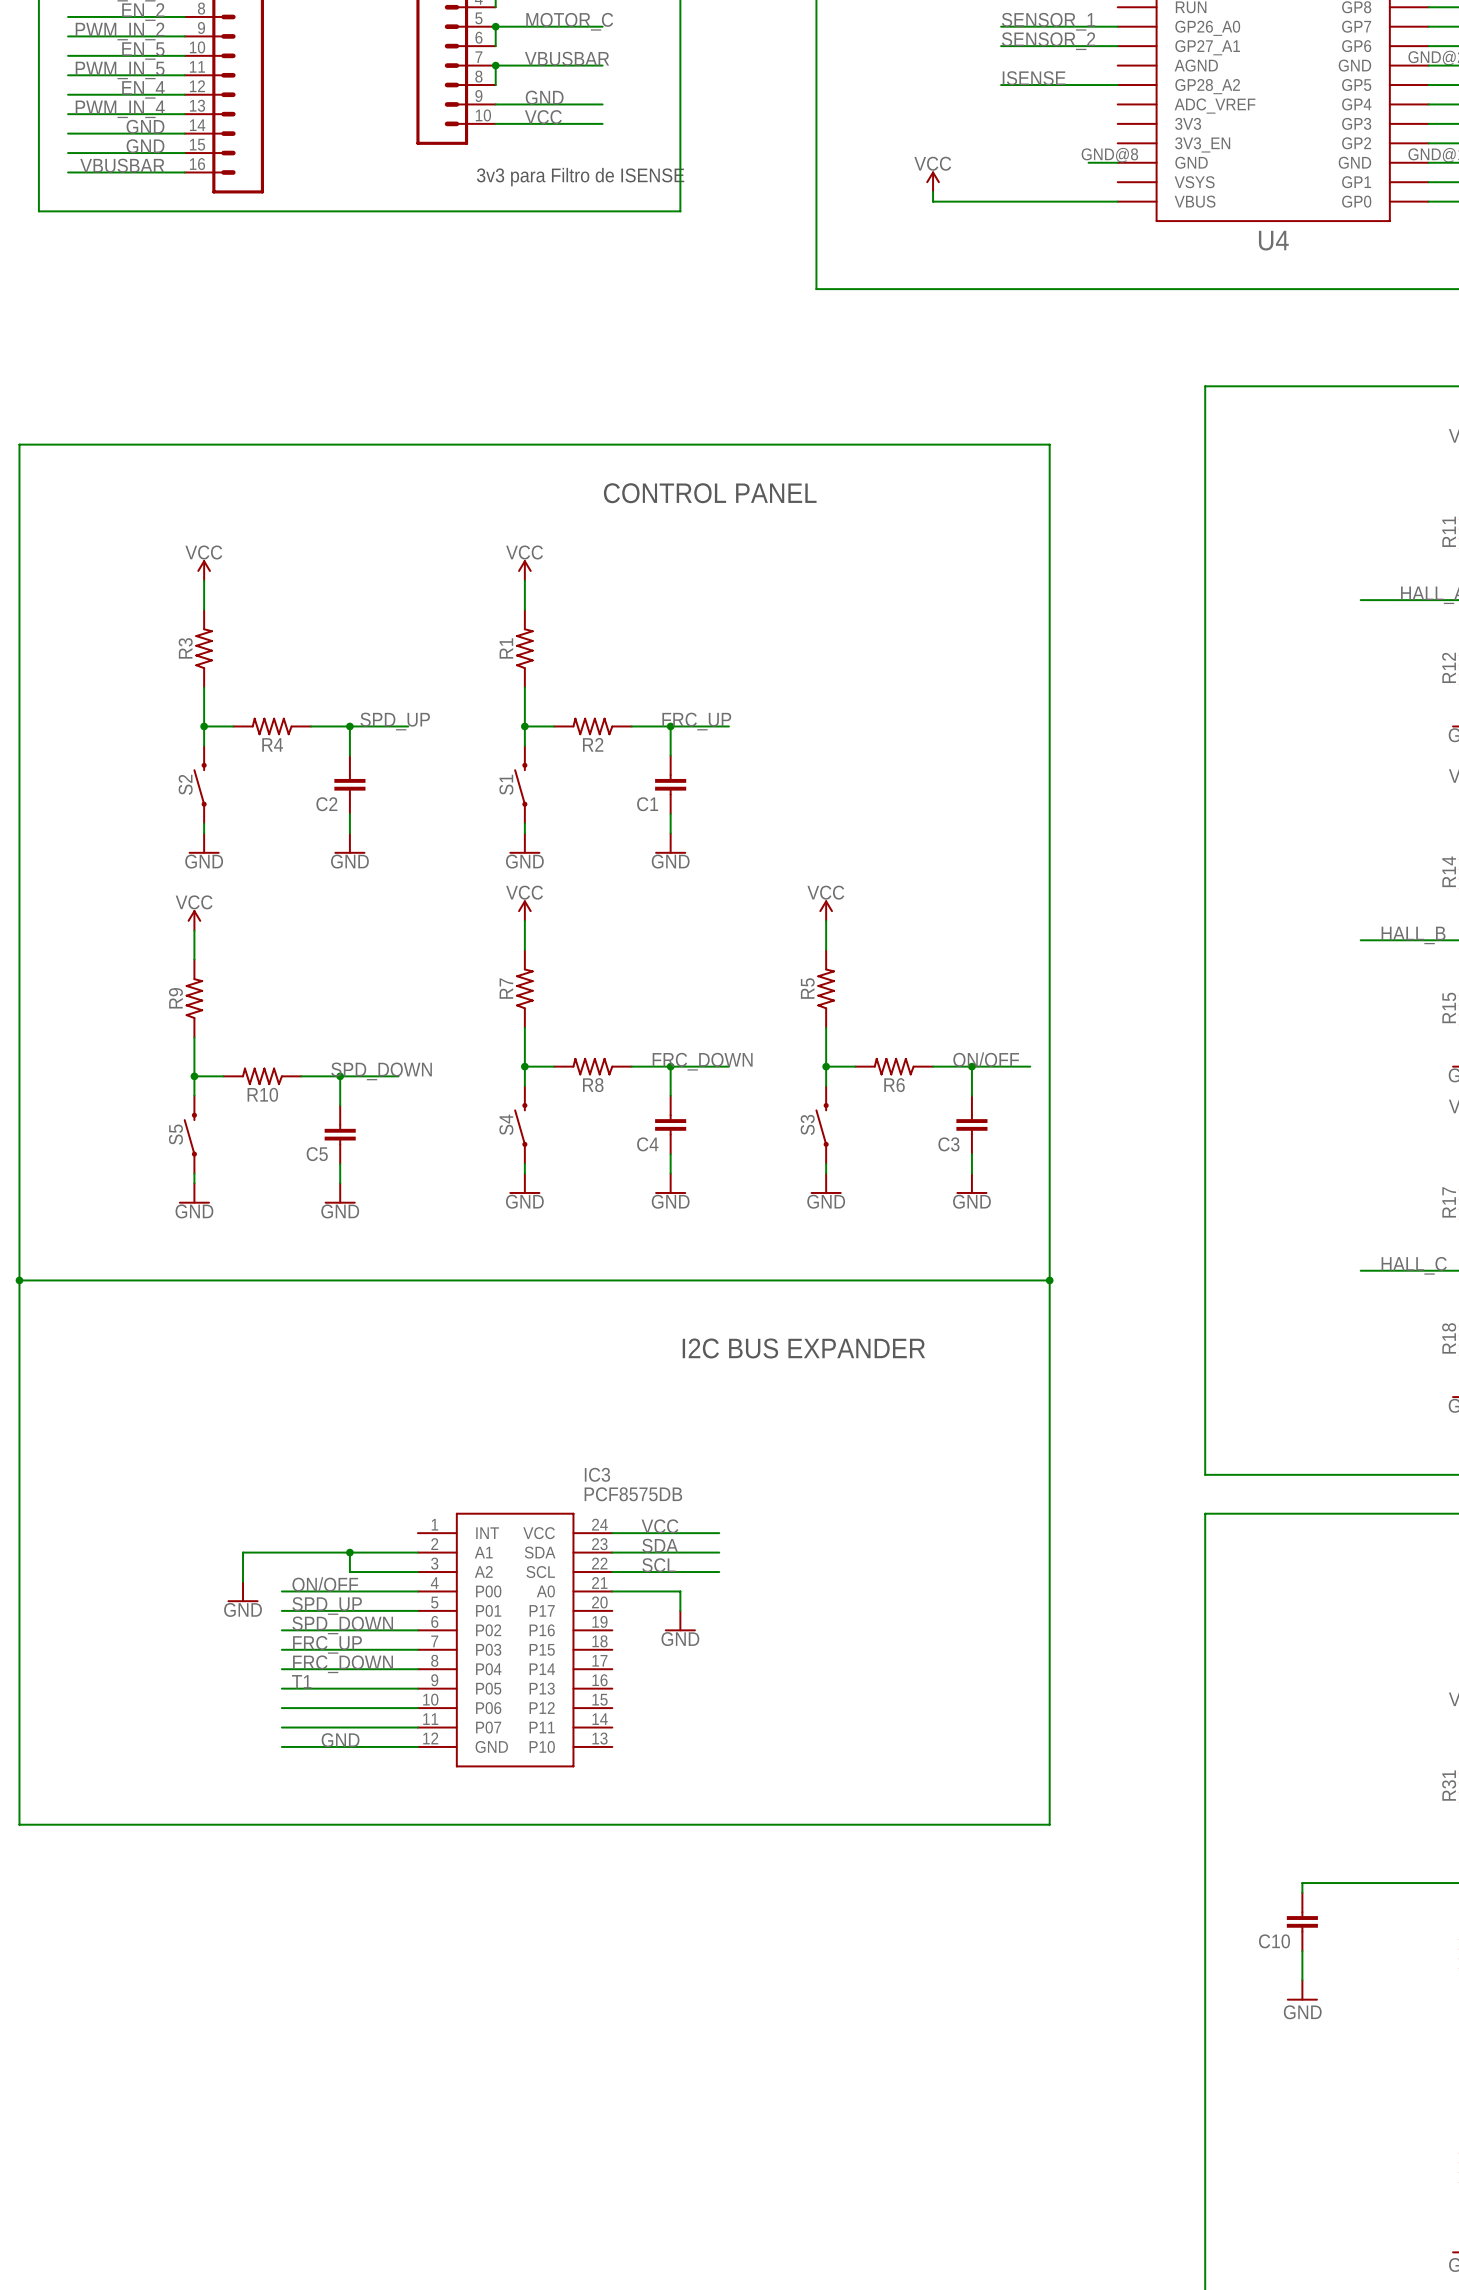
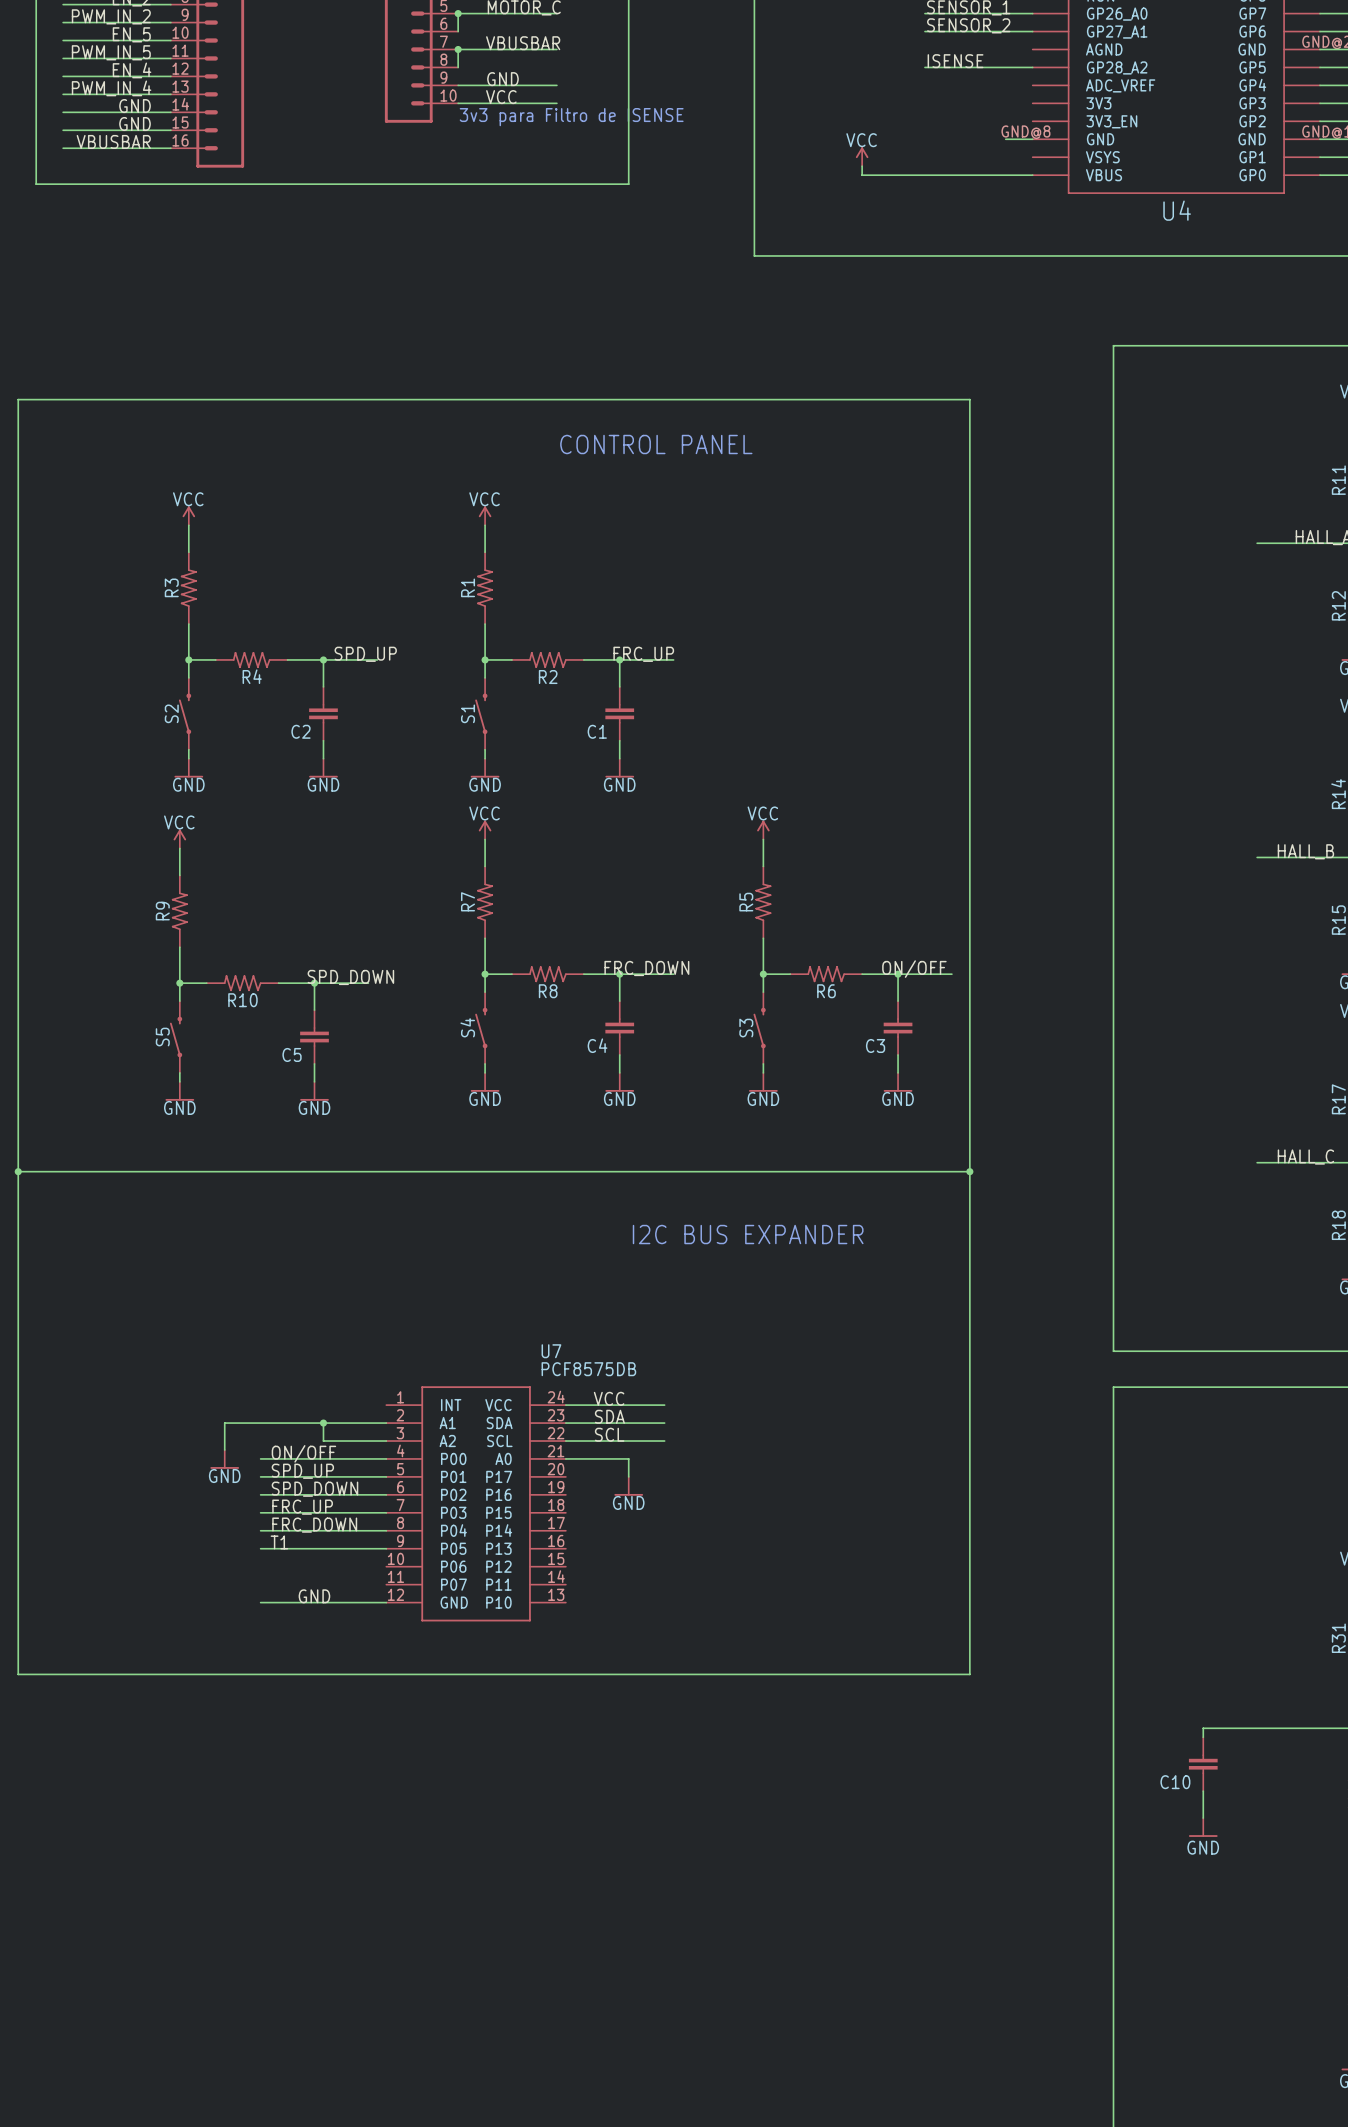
text position: 3v3 para Filtro de ISENSE (580, 177) -> 3v3 para Filtro de ISENSE (571, 117)
IC3 name: IC3 (597, 1474) -> U7 (551, 1351)
wire: (281, 1708) (417, 1708) -> none
wire: (281, 1727) (417, 1727) -> none

